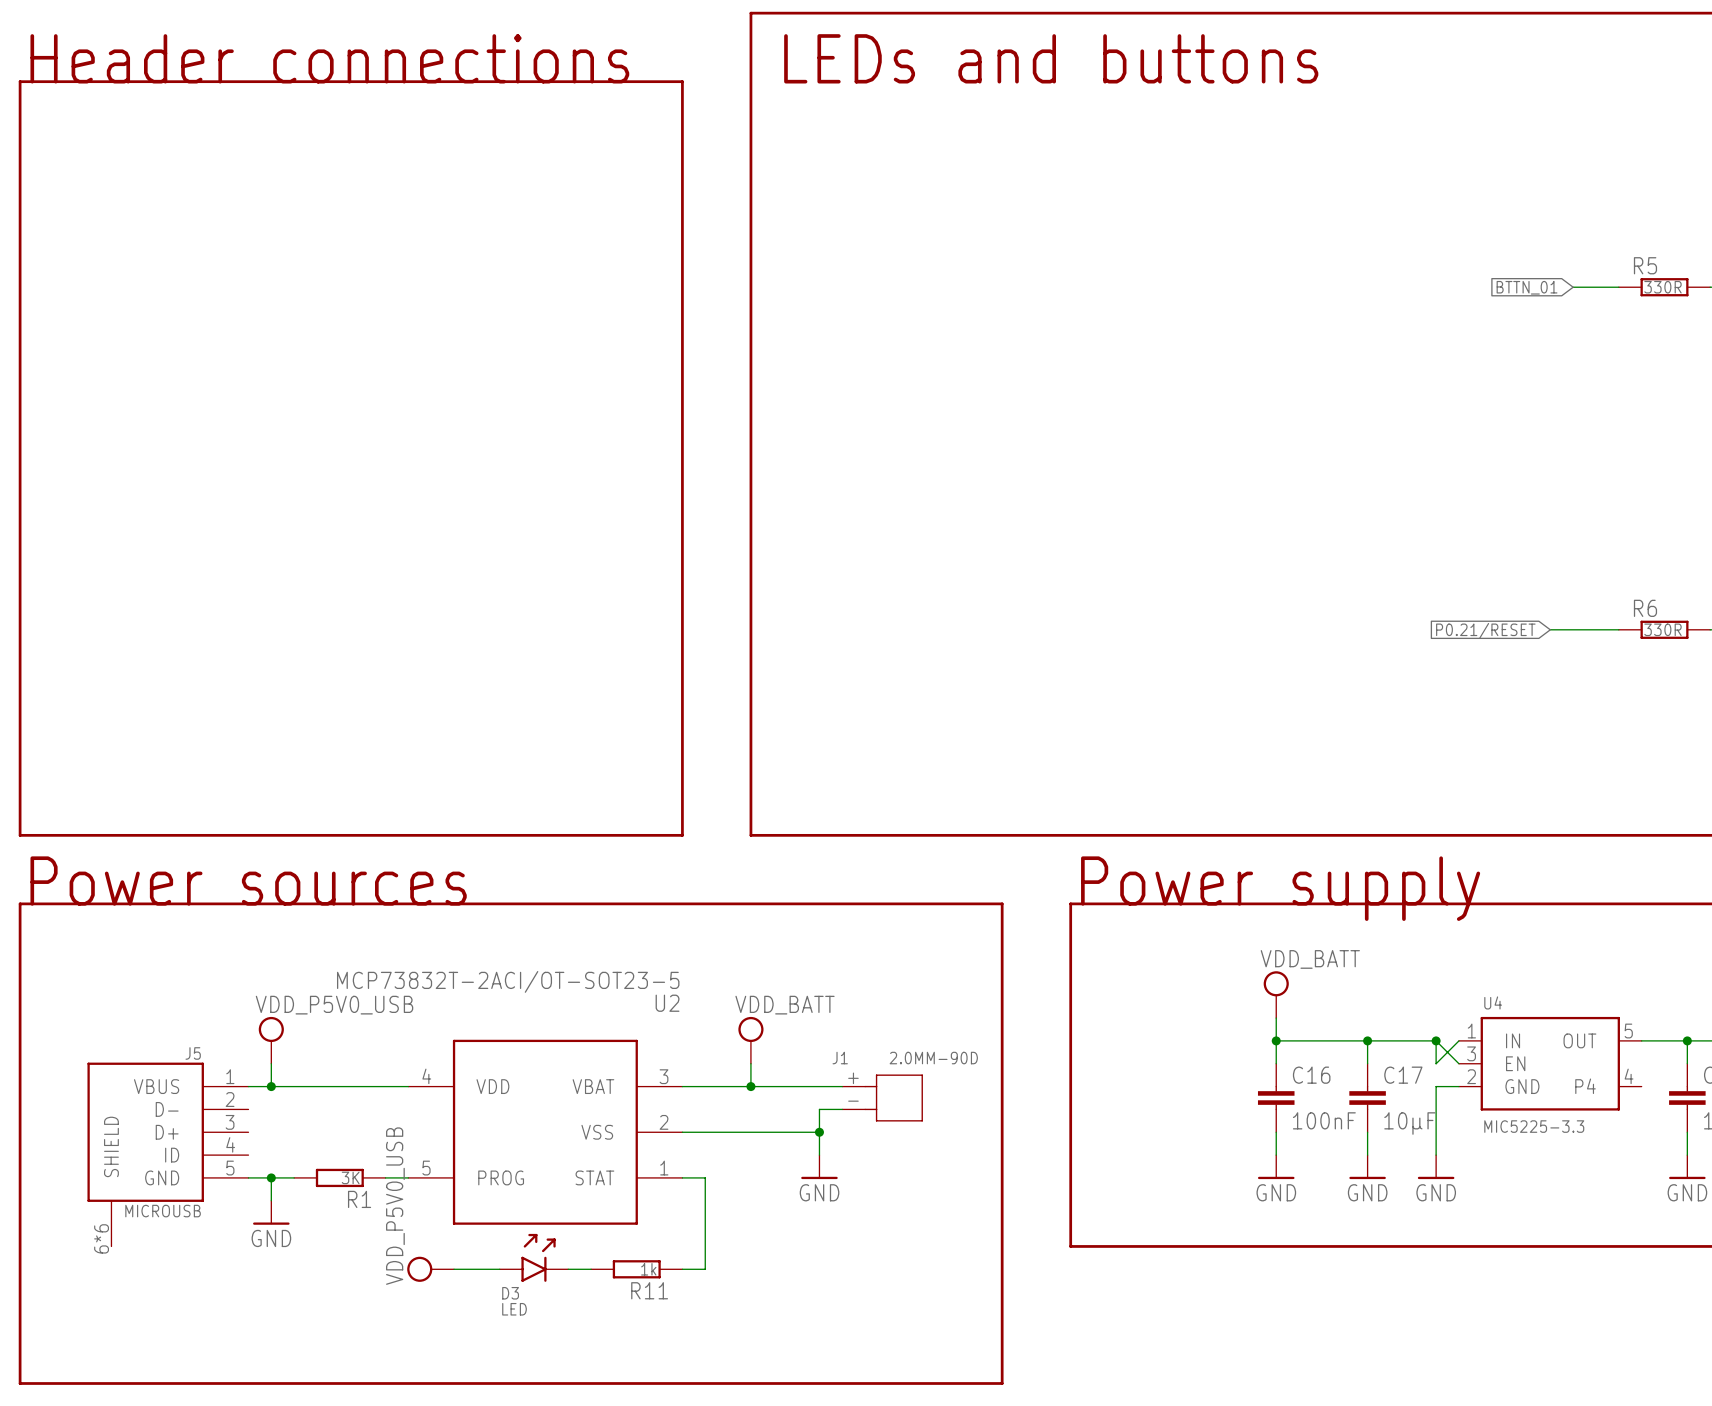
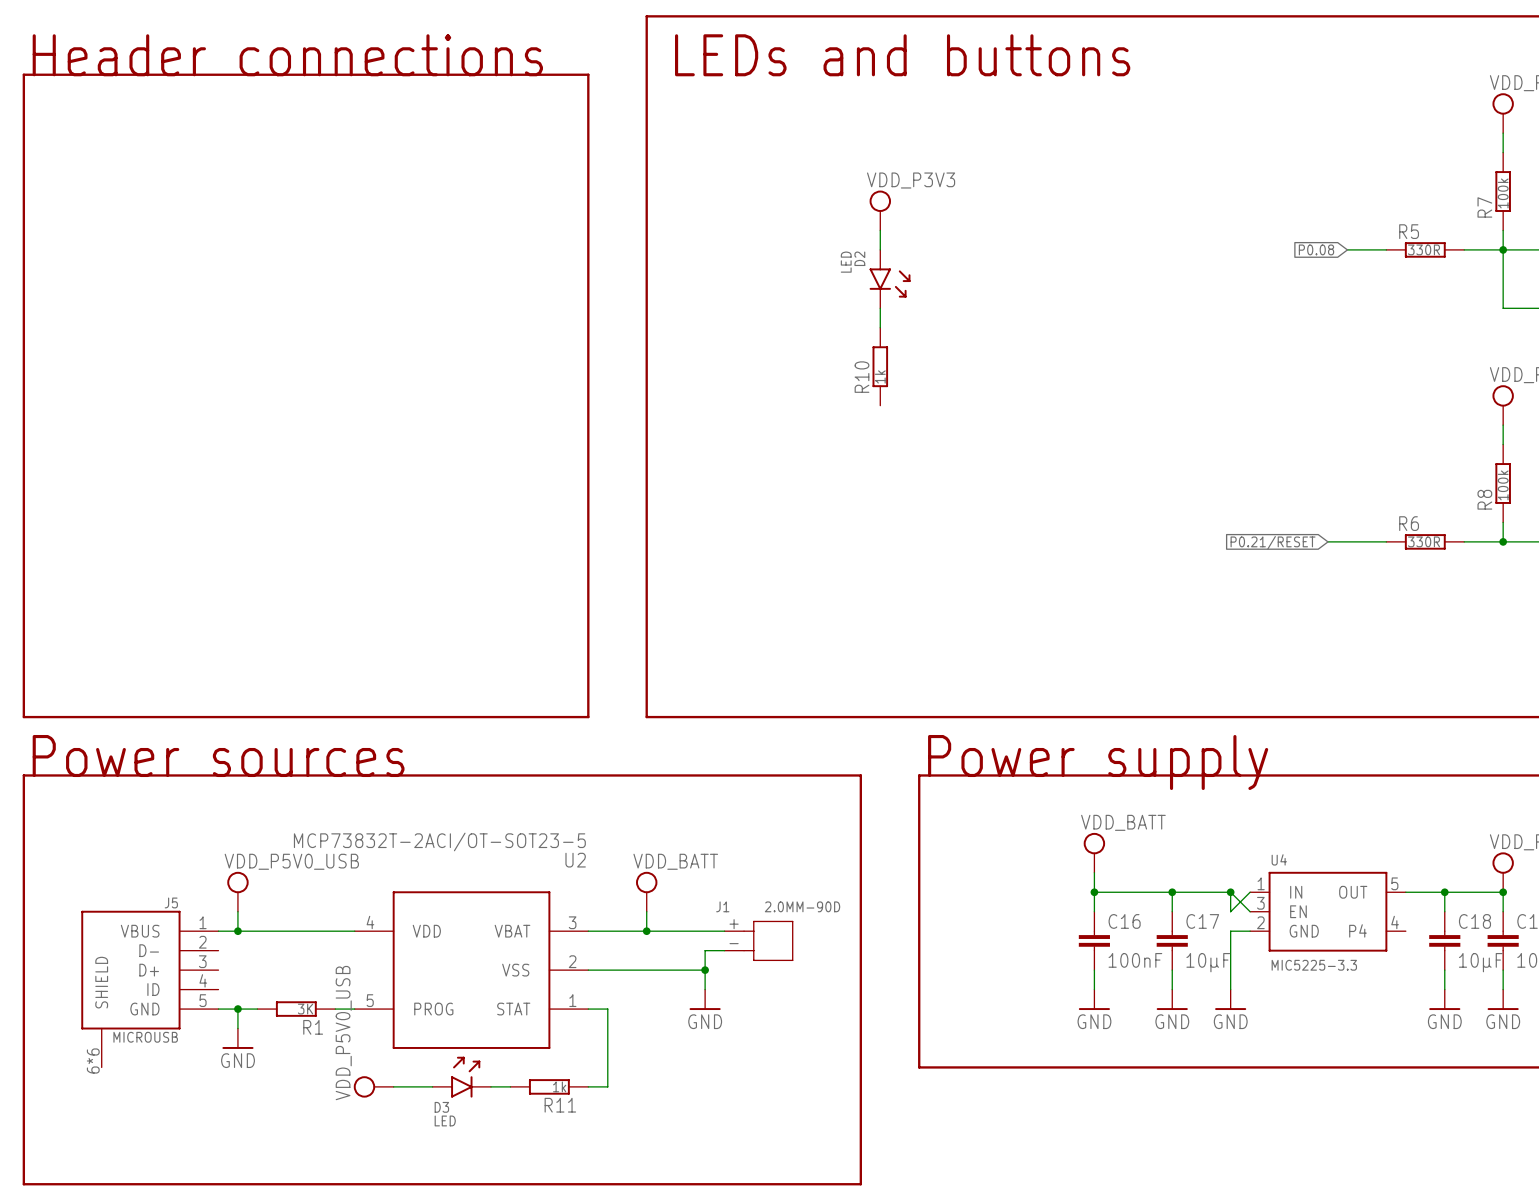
power symbol: none -> VDD_P3V3 (880, 210)
wire: none -> (880, 230) (880, 249)
global label: BTTN_01 (1527, 287) -> P0.08 (1316, 249)
D2: none -> LED (890, 279)
wire: none -> (880, 308) (880, 327)
R10: none -> 1k (880, 366)

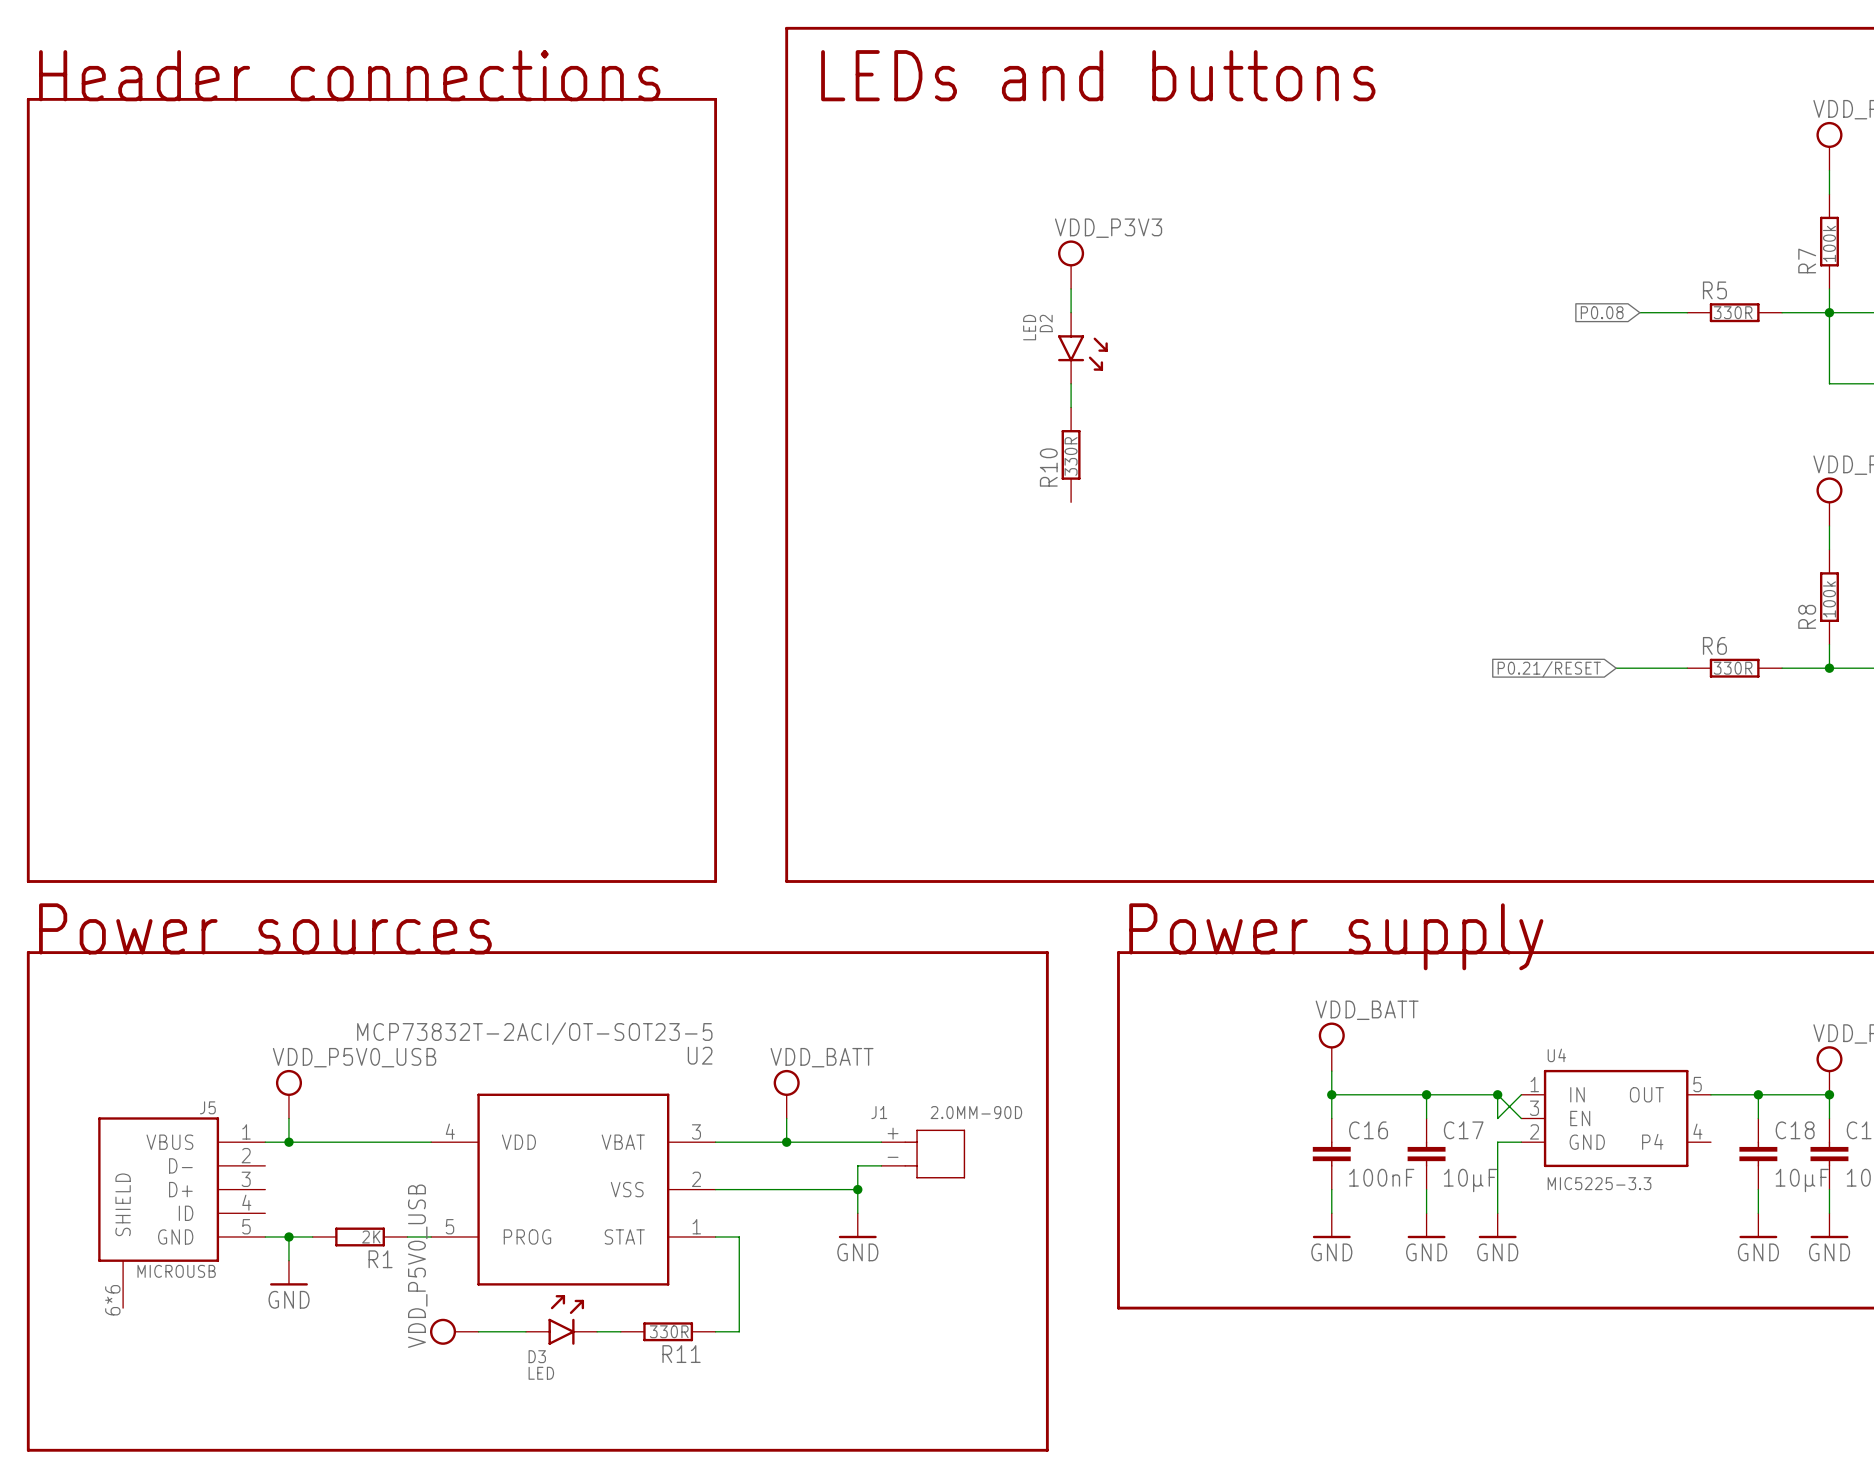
R10 value: 1k (880, 376) -> 330R (1071, 456)
R1 value: 3K (305, 1009) -> 2K (371, 1236)
R11 value: 1k (559, 1086) -> 330R (669, 1331)

